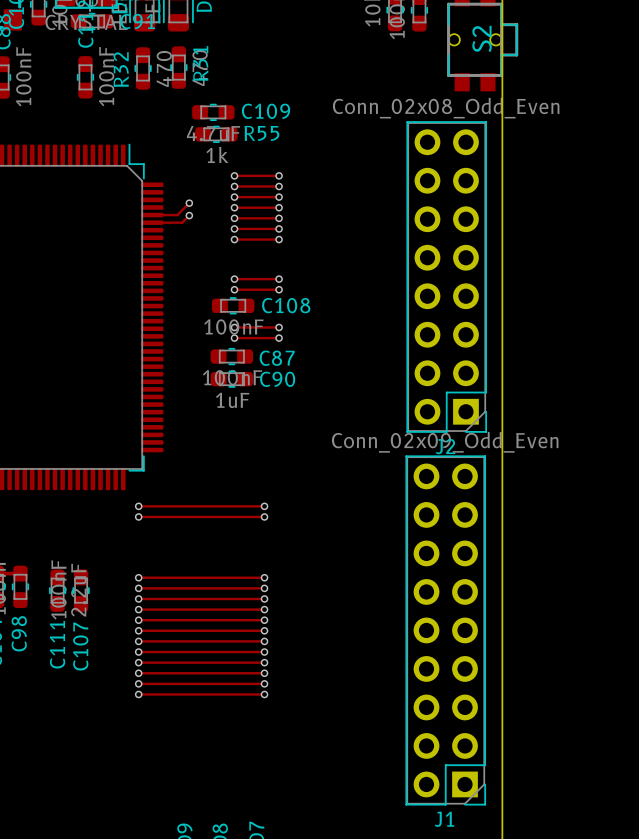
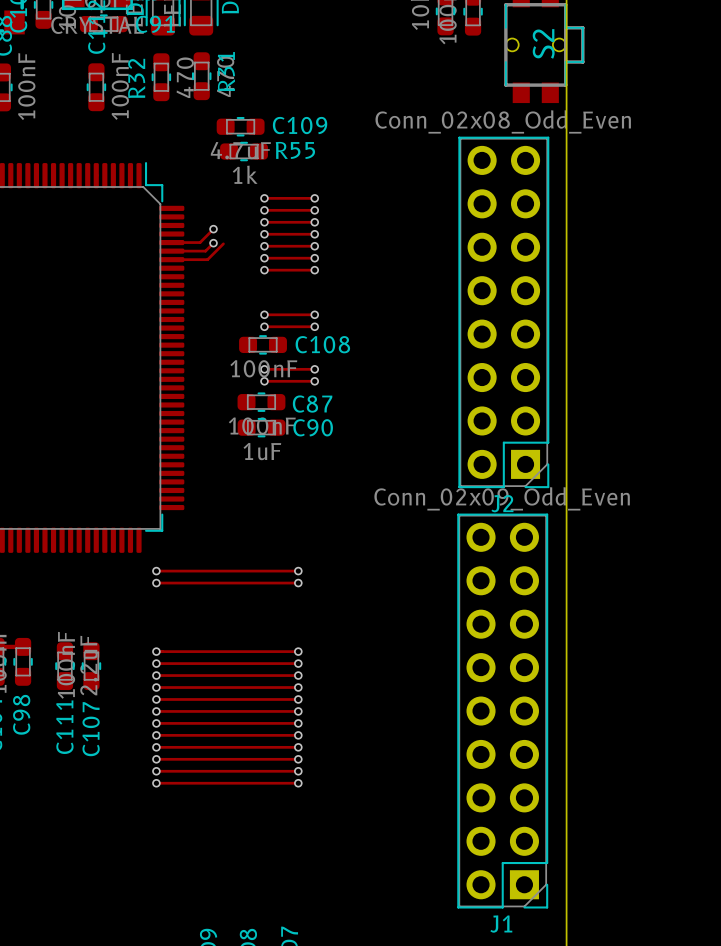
track: none -> (223, 243) (207, 259) (171, 259)

